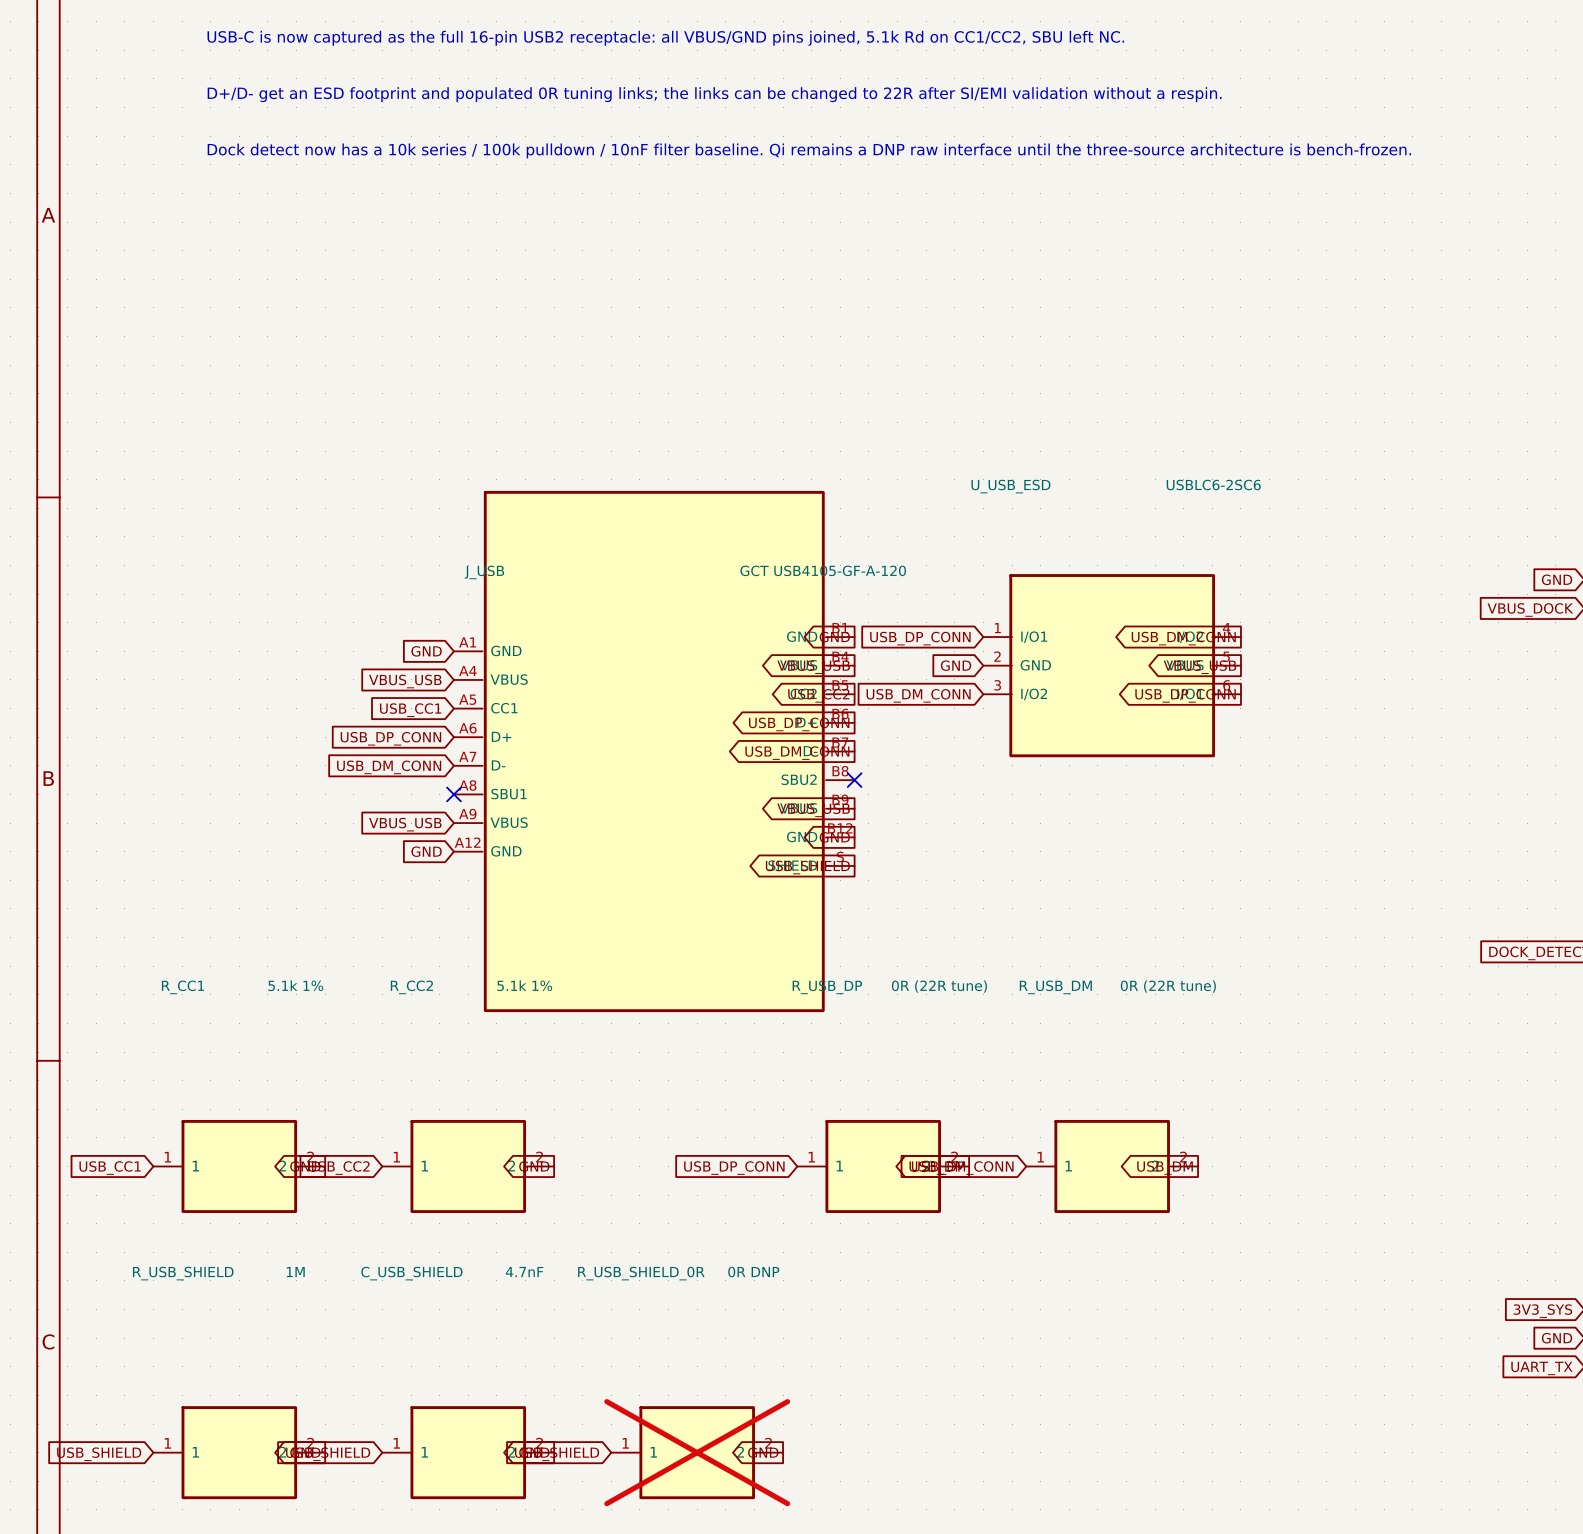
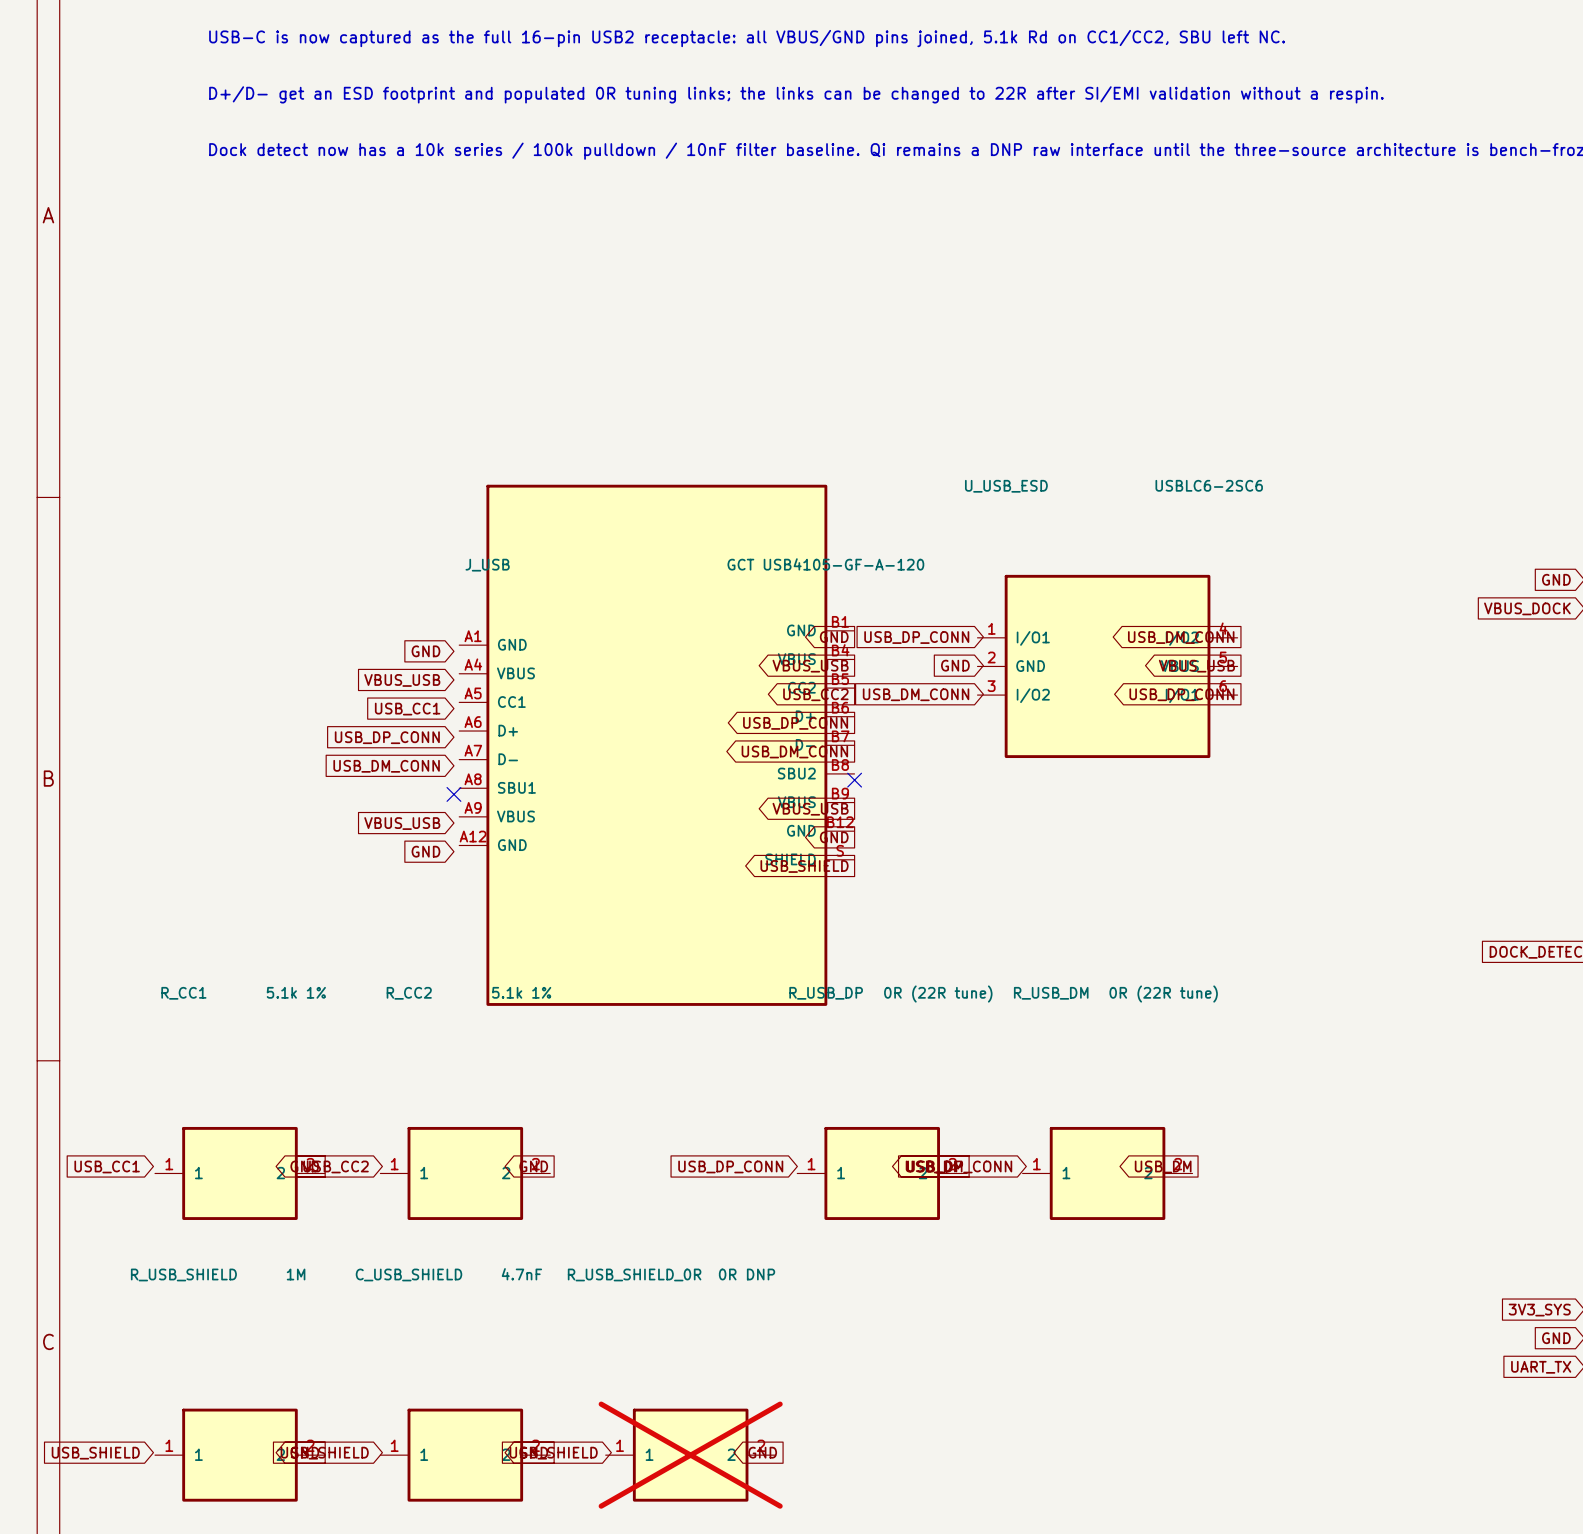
J_USB symbol: [453, 490, 855, 1013] -> [459, 484, 855, 1006]
U_USB_ESD symbol: [983, 574, 1241, 758] -> [977, 574, 1238, 759]
R_CC1 symbol: [153, 1119, 326, 1213] -> [155, 1126, 325, 1220]
R_CC2 symbol: [382, 1119, 555, 1213] -> [380, 1126, 551, 1220]
R_USB_DP symbol: [797, 1119, 970, 1213] -> [797, 1126, 968, 1220]
R_USB_DM symbol: [1026, 1119, 1199, 1213] -> [1022, 1126, 1193, 1220]
R_USB_SHIELD symbol: [153, 1406, 326, 1500] -> [155, 1408, 325, 1502]
C_USB_SHIELD symbol: [382, 1406, 555, 1500] -> [380, 1408, 551, 1502]
R_USB_SHIELD_0R symbol: [611, 1406, 784, 1500] -> [605, 1408, 776, 1502]

